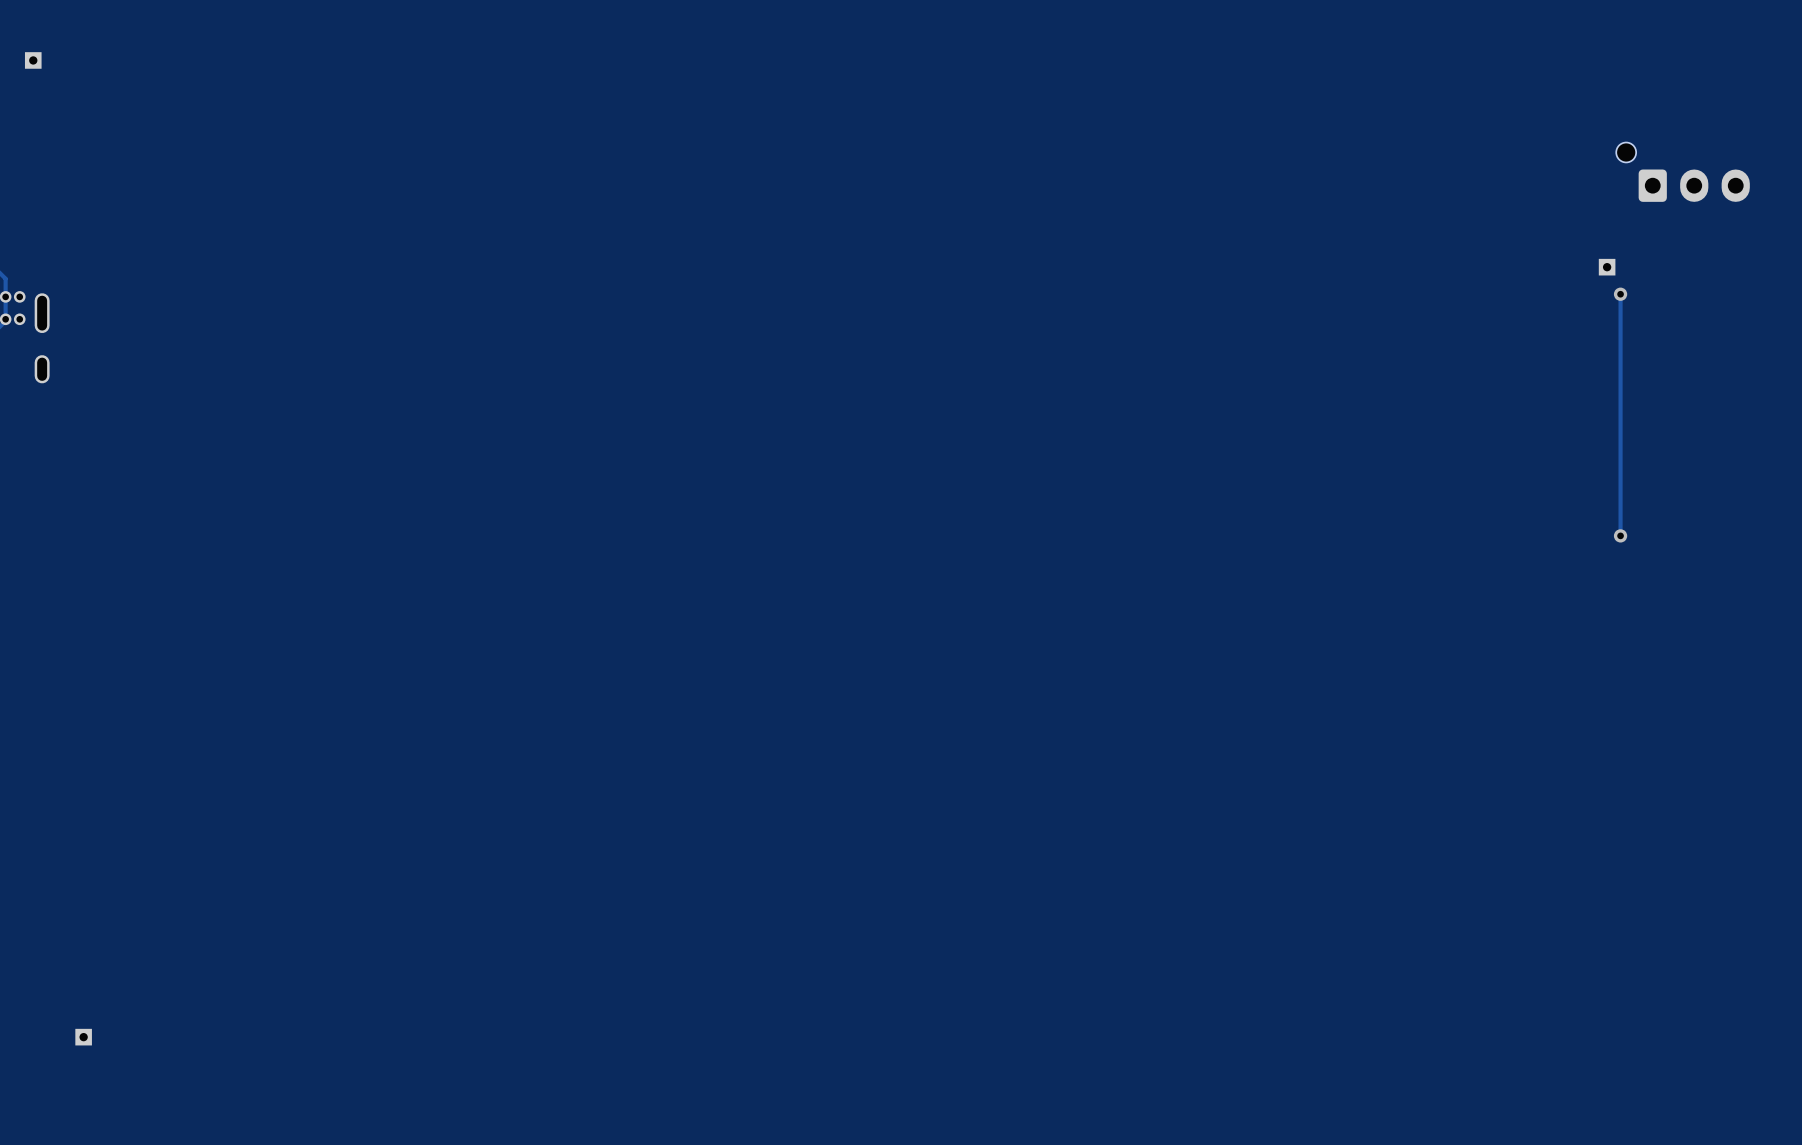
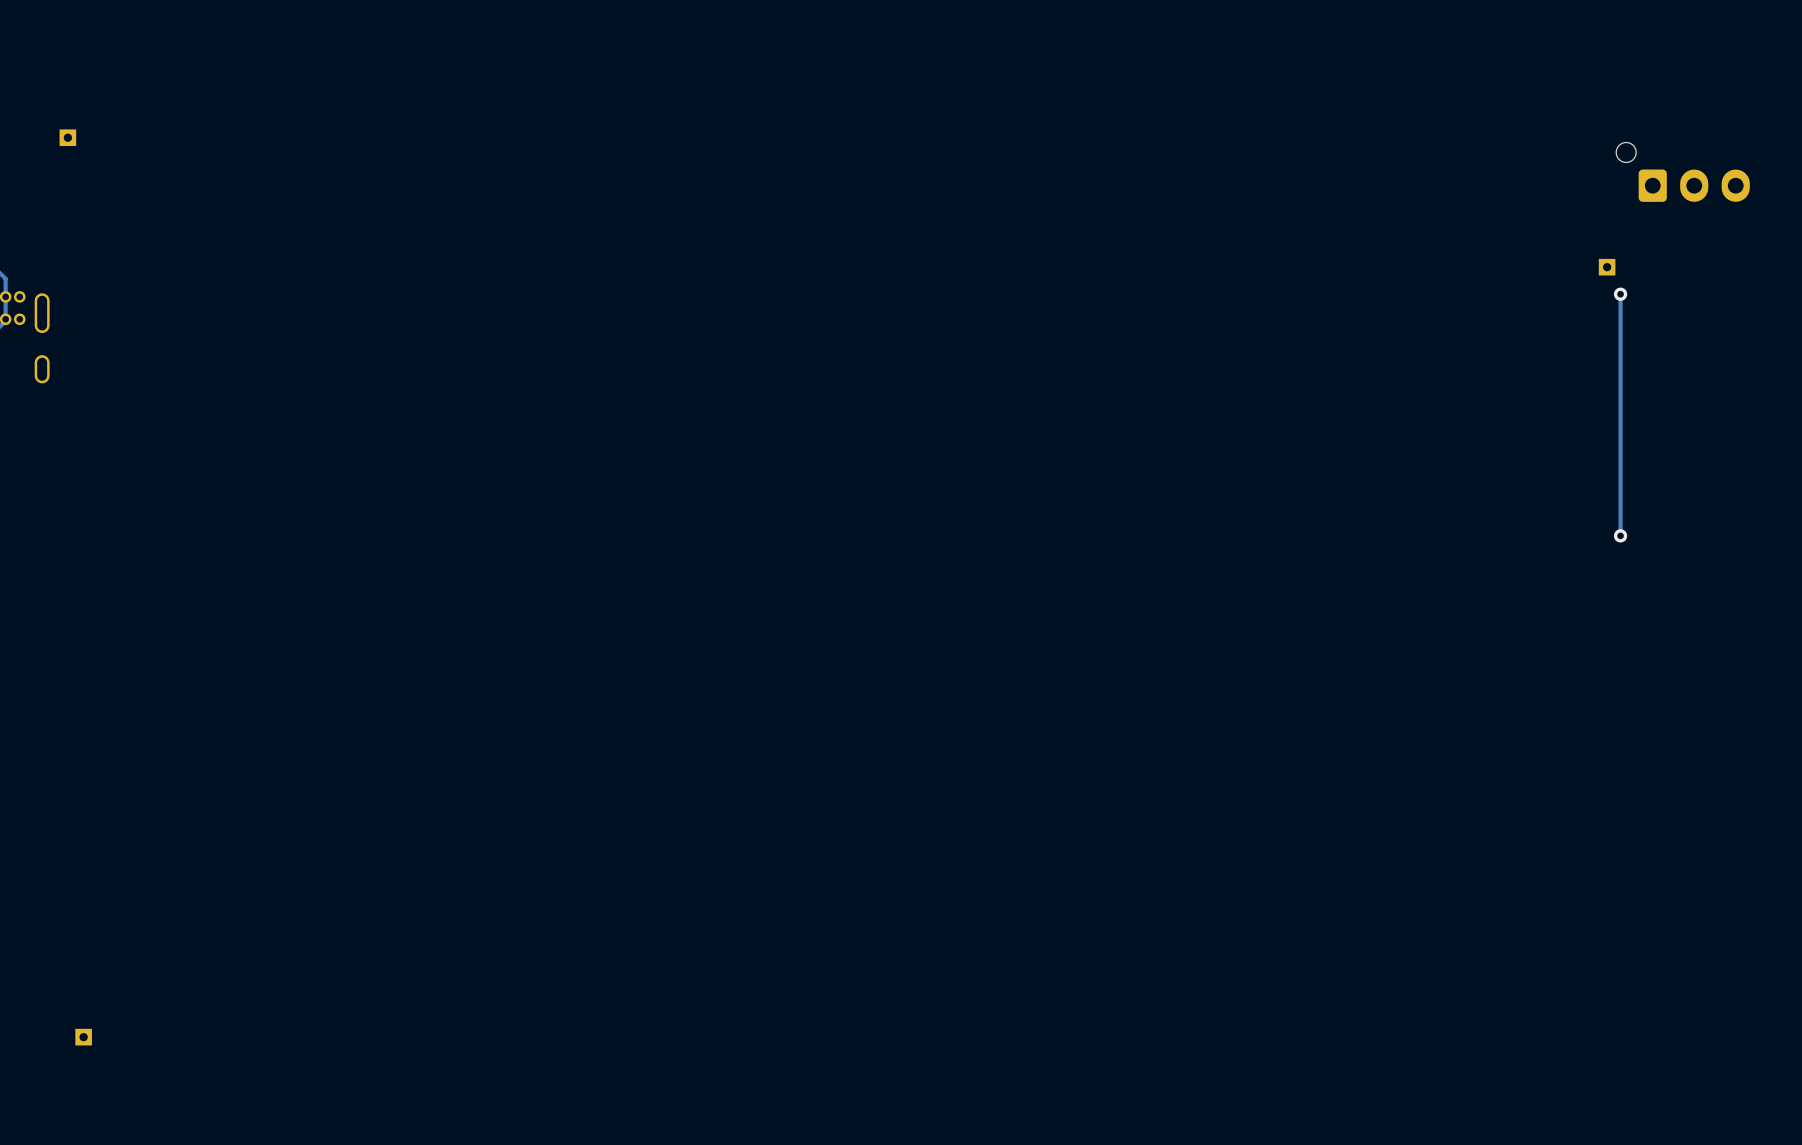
part position: (33, 60) -> (67, 137)

